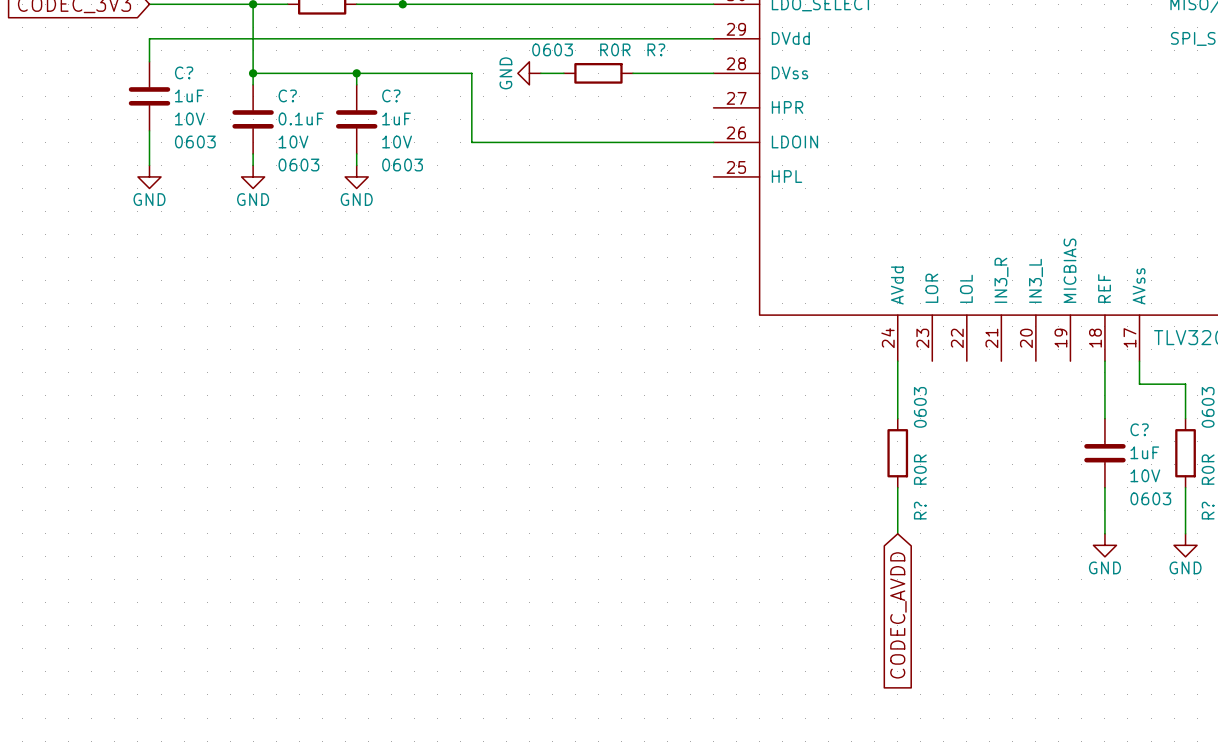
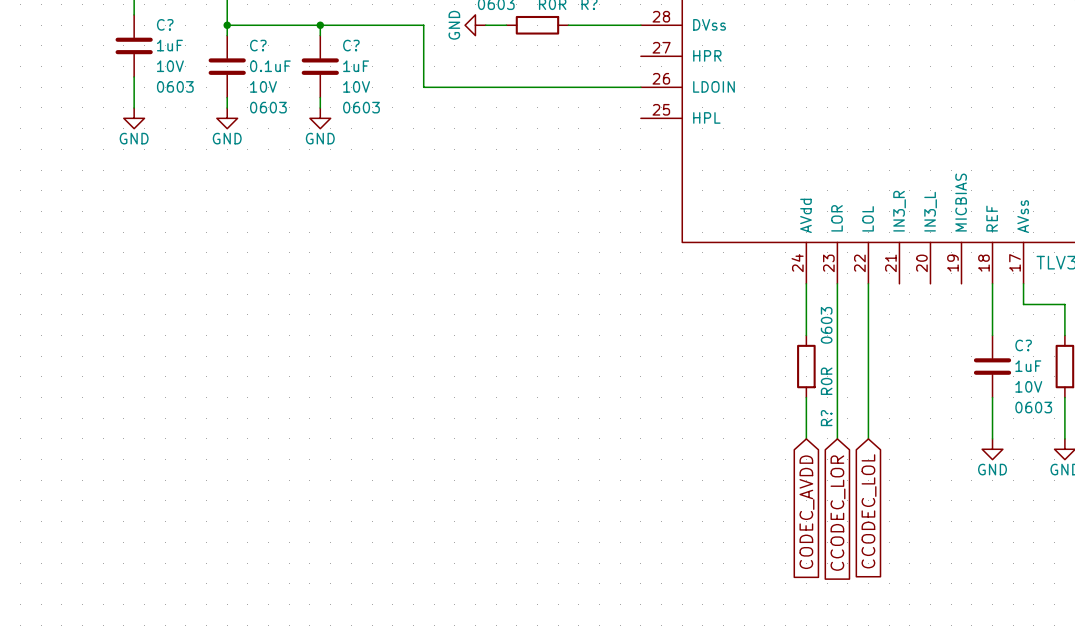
wire: none -> (837, 283) (837, 438)
wire: none -> (868, 283) (868, 438)
global label: none -> CCODEC_LOL (869, 511)
global label: none -> CCODEC_LOR (837, 513)

